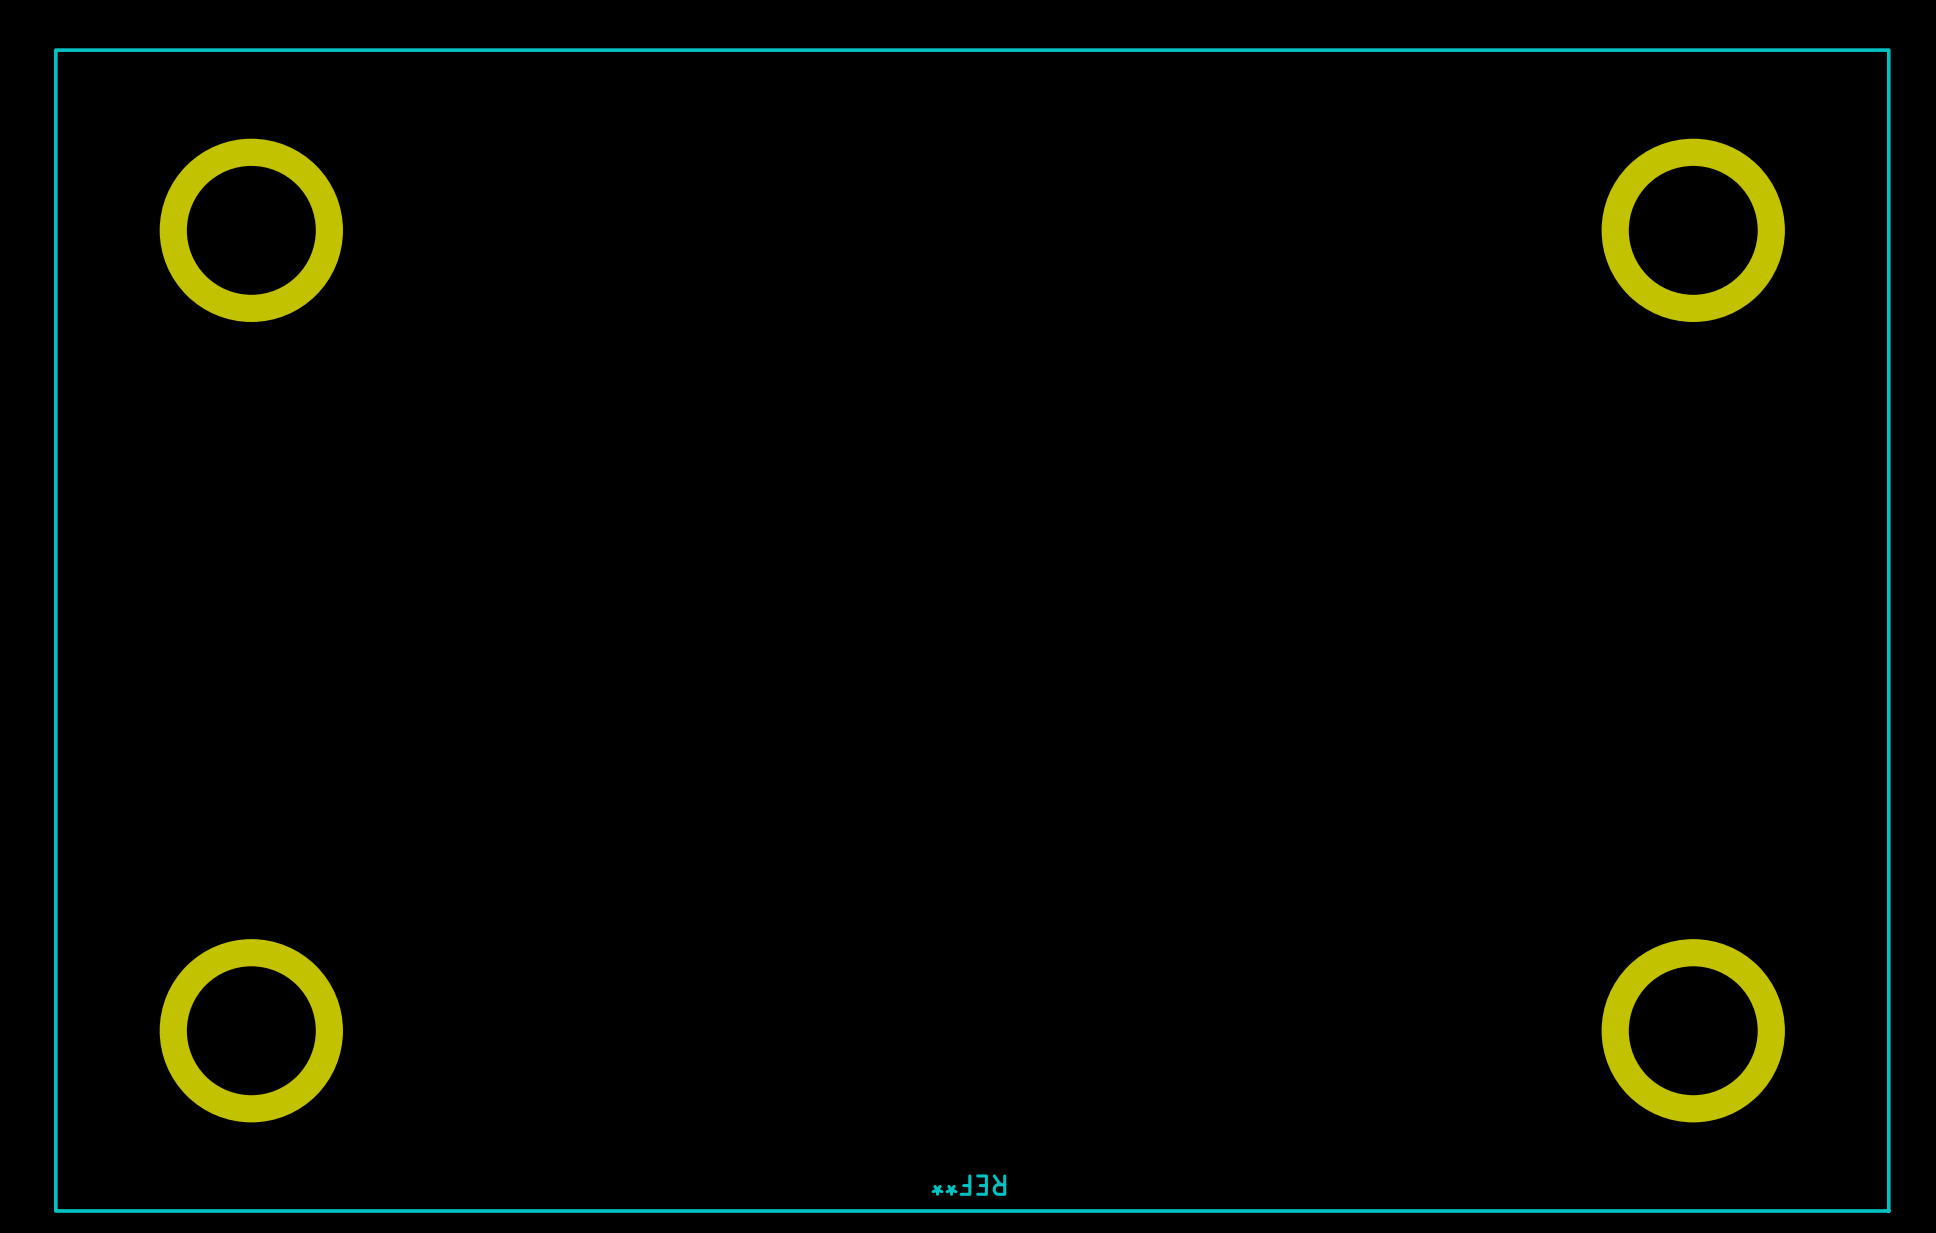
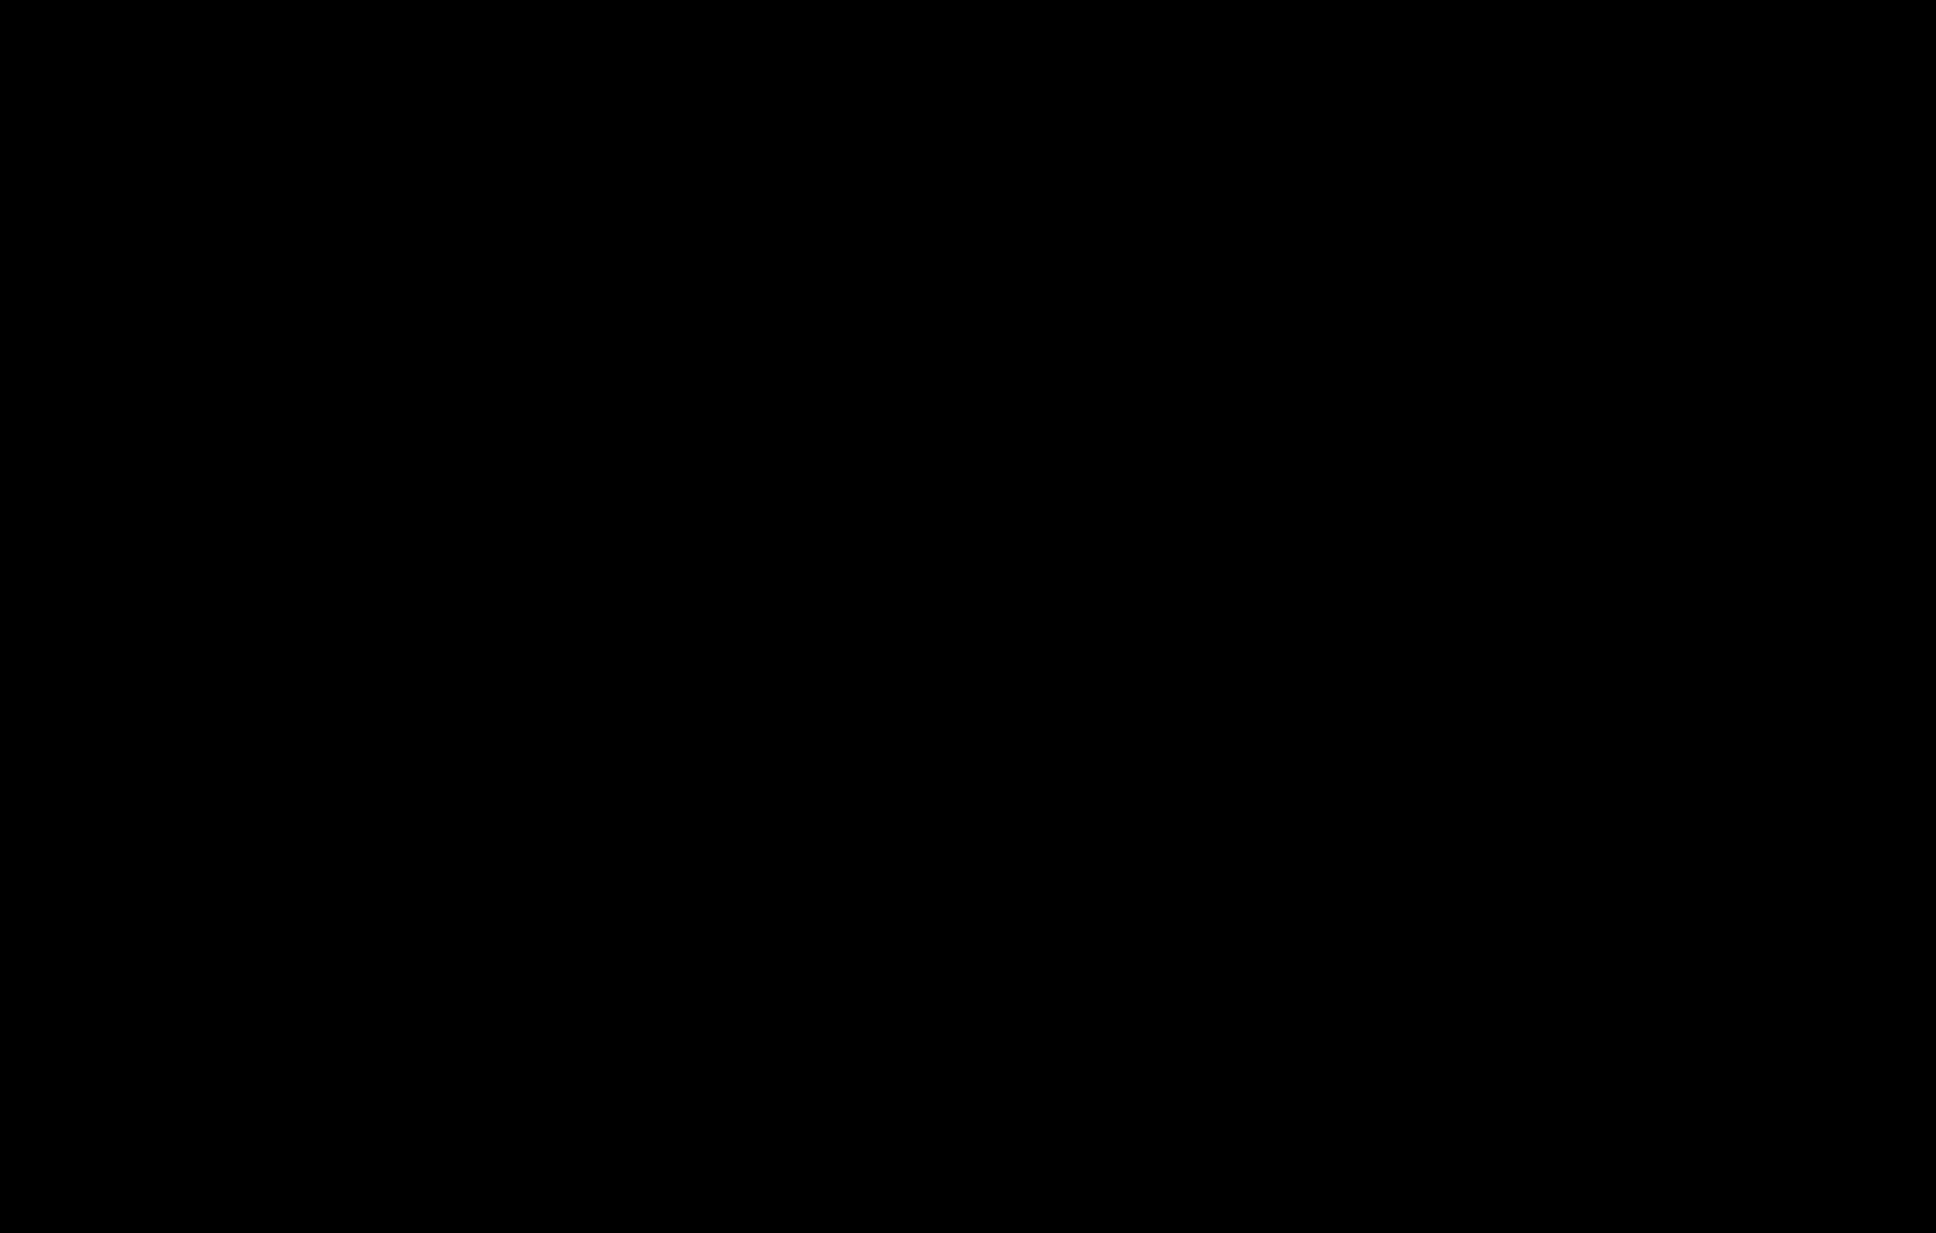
part: (972, 630) -> none

